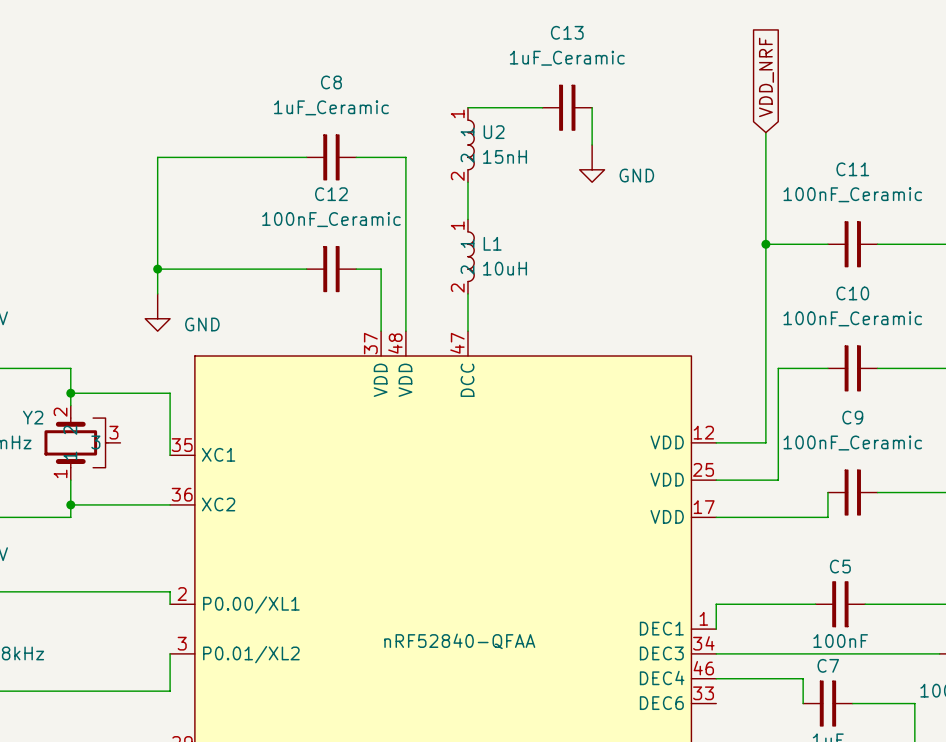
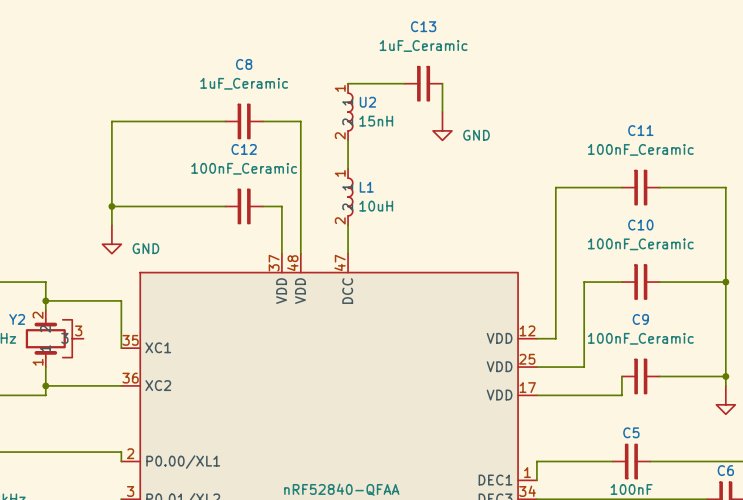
global label: VDD_NRF (766, 77) -> none
wire: (765, 132) (765, 442) (741, 442) -> (574, 187) (555, 187) (555, 338)
junction: (765, 244) -> none

